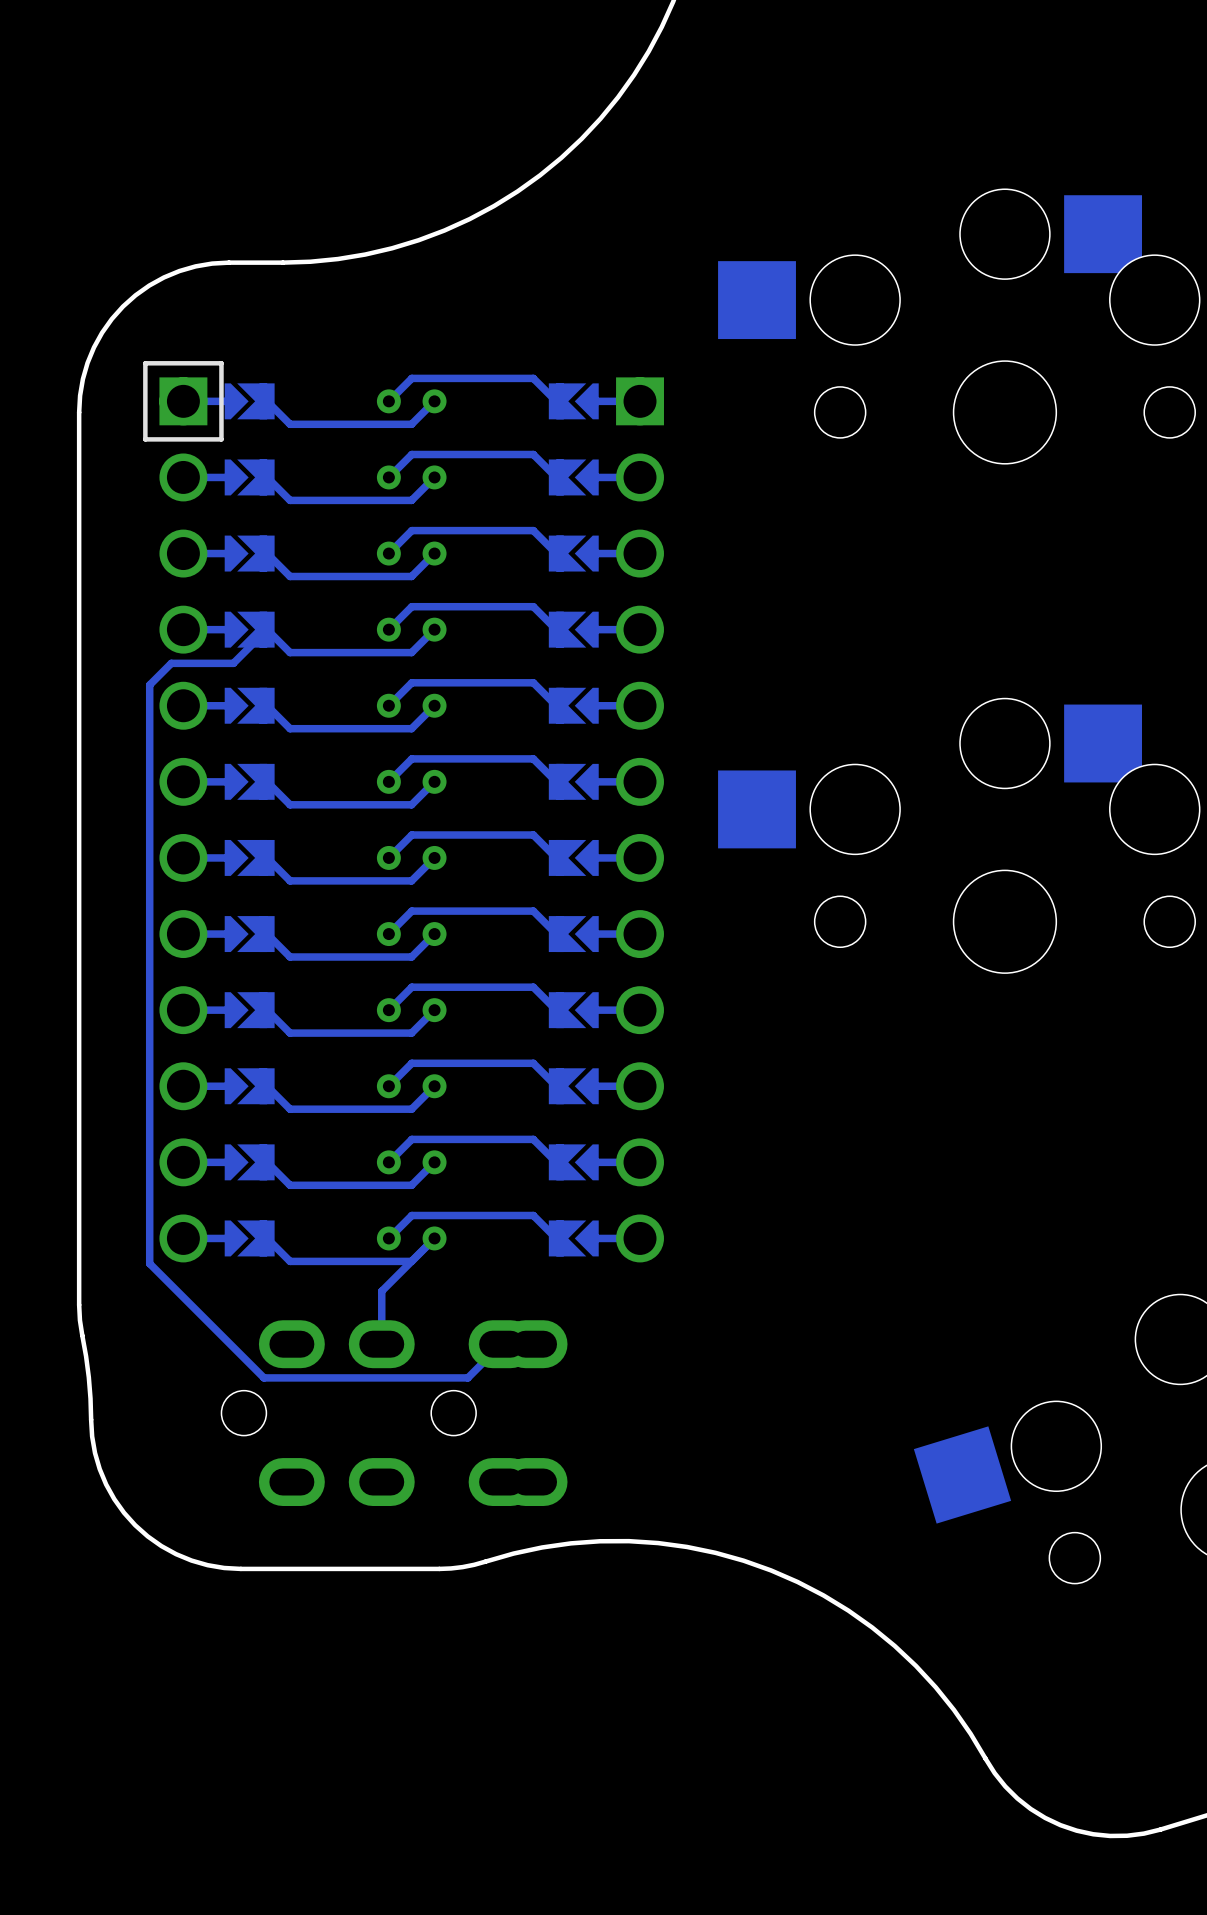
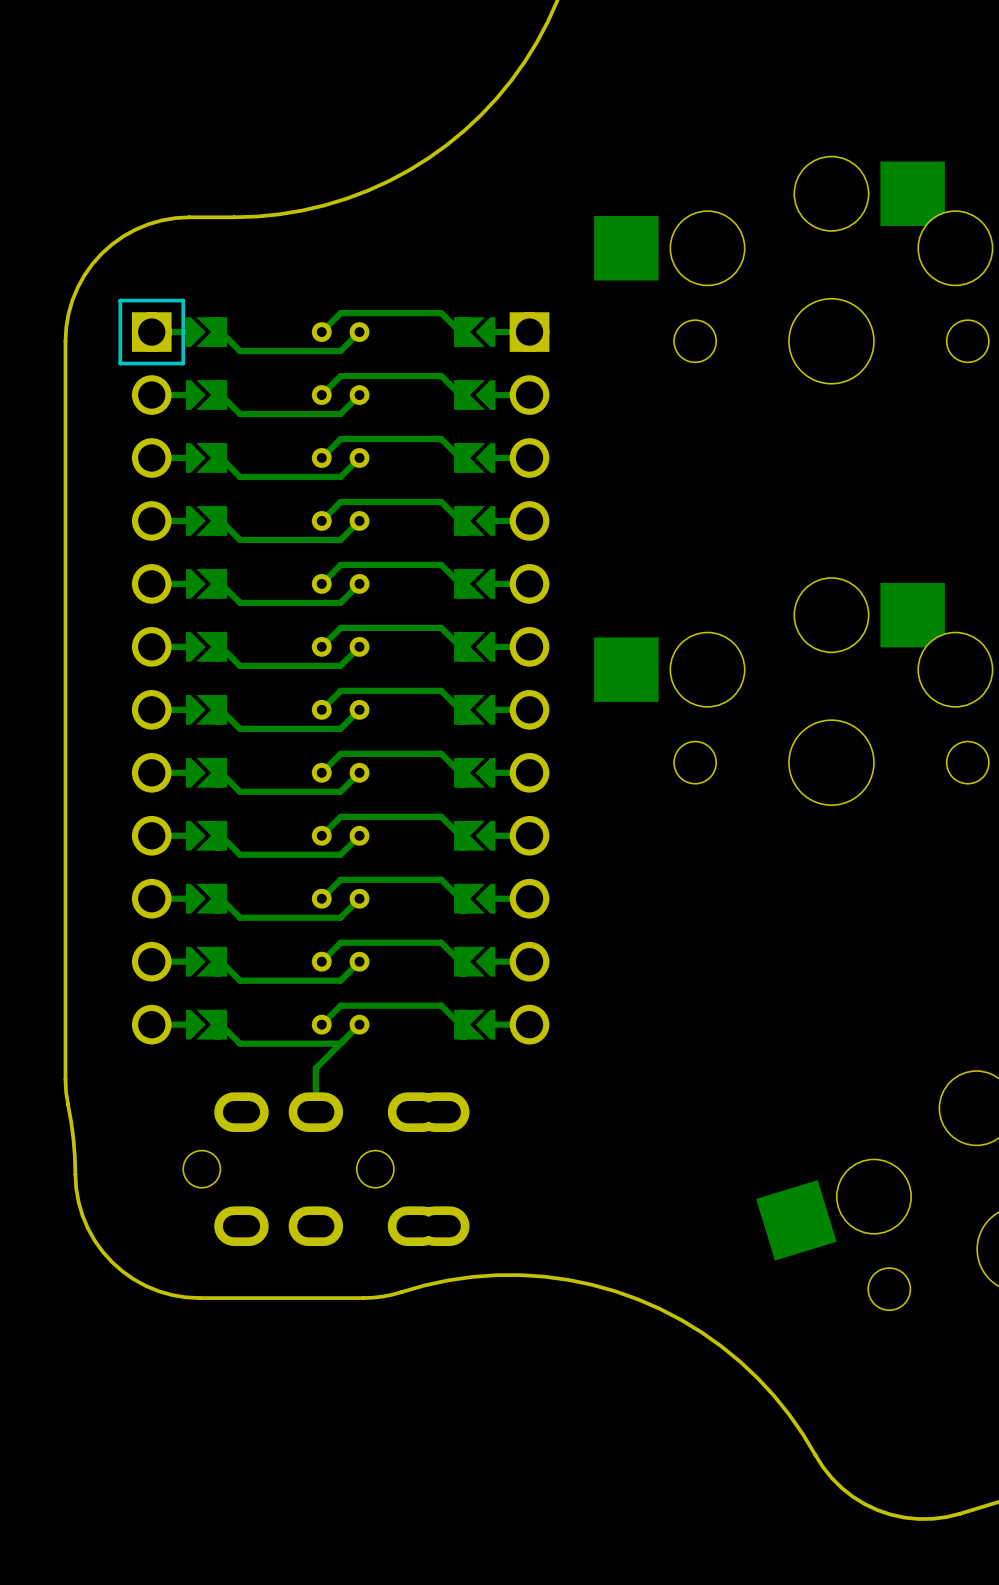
track: (267, 629) (233, 663) (171, 663) (149, 685) (149, 1263) (263, 1377) (467, 1377) (501, 1344) -> none

